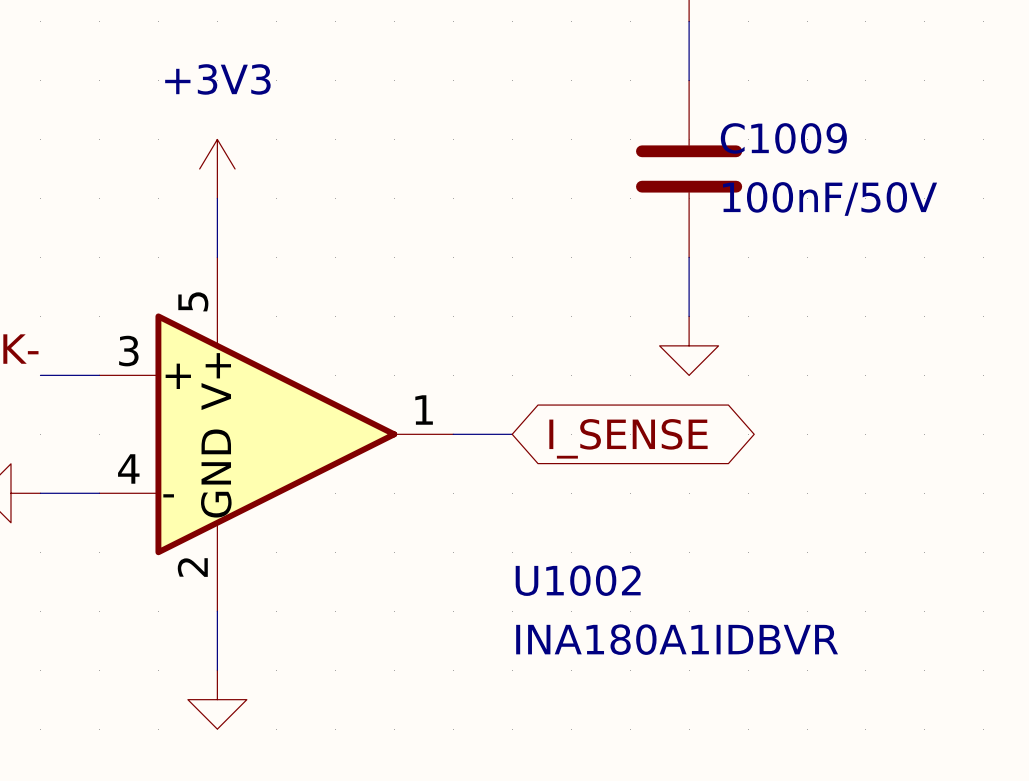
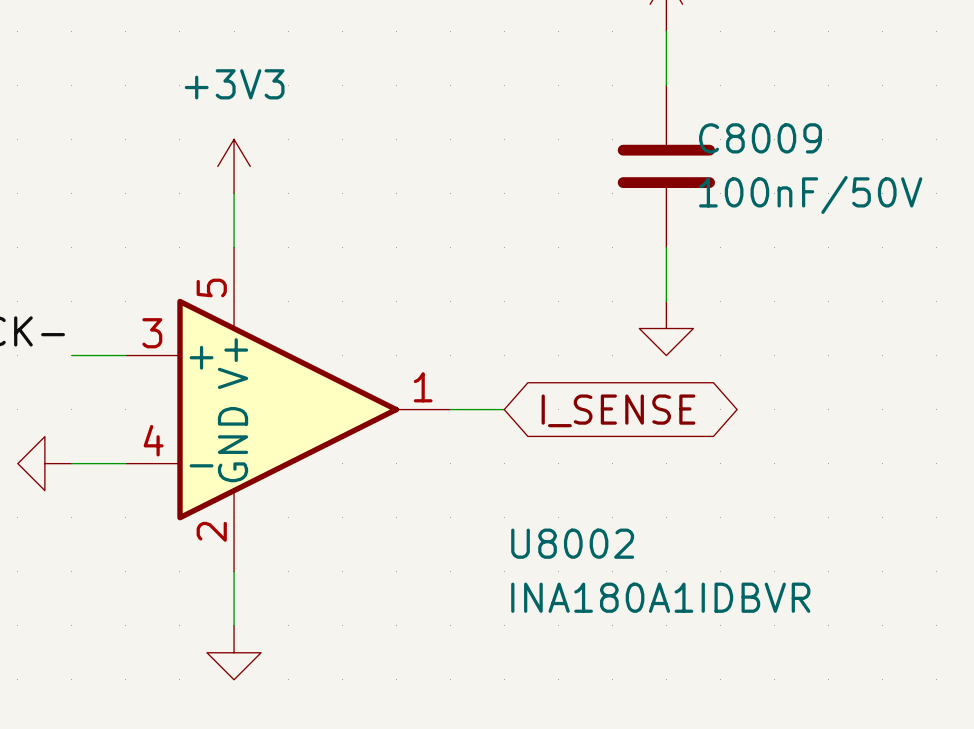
C1009 name: C1009 (783, 138) -> C8009 (760, 138)
U1002 name: U1002 (578, 580) -> U8002 (572, 543)

